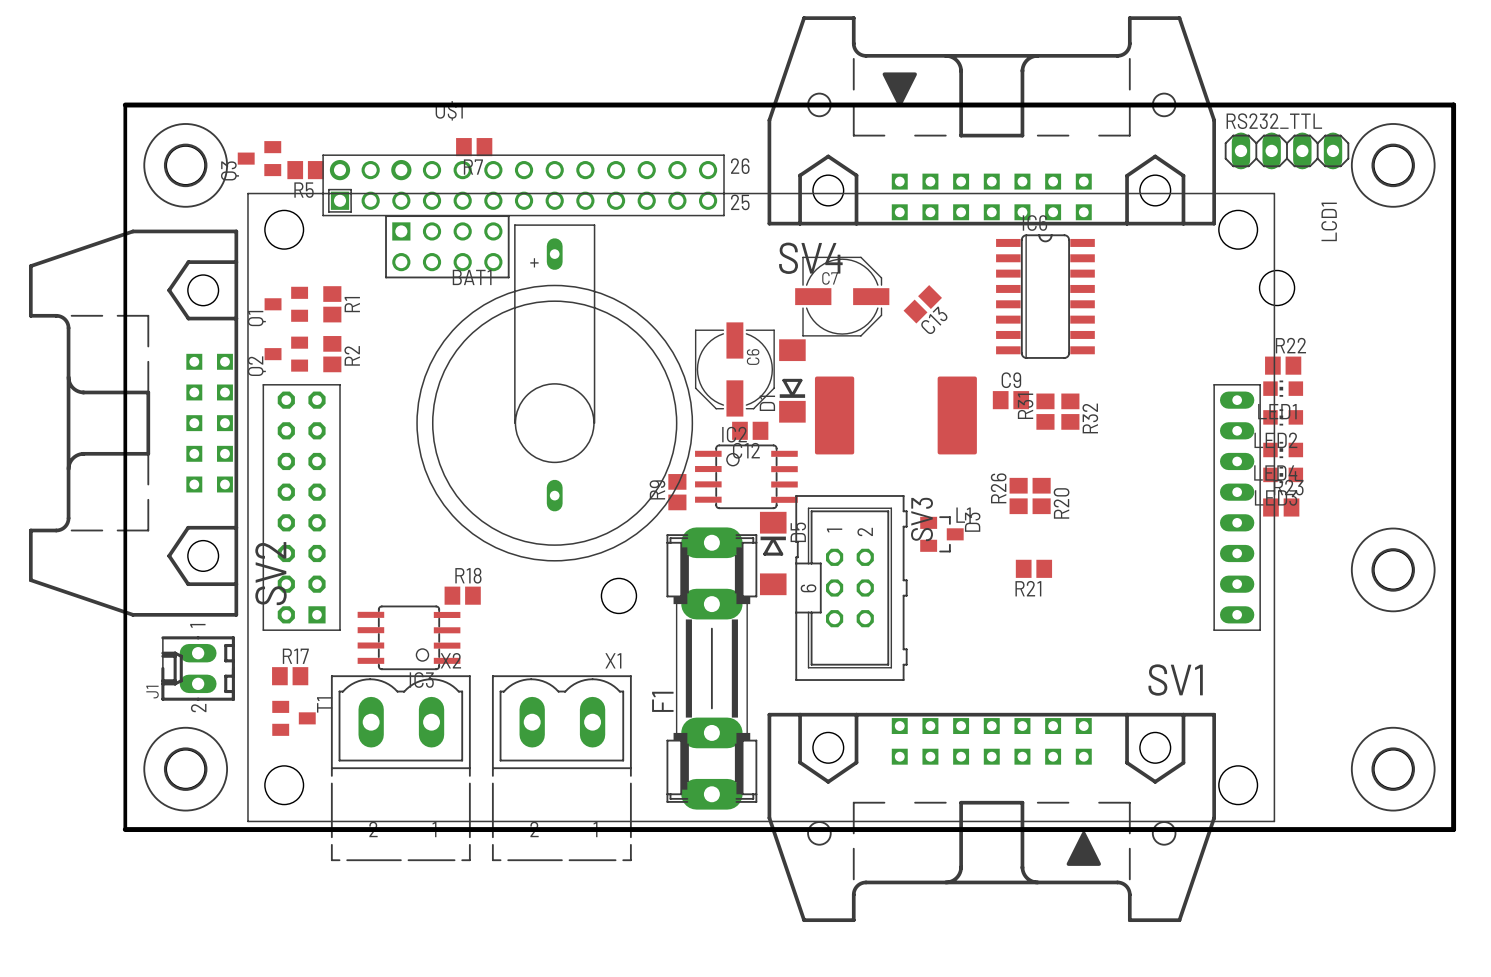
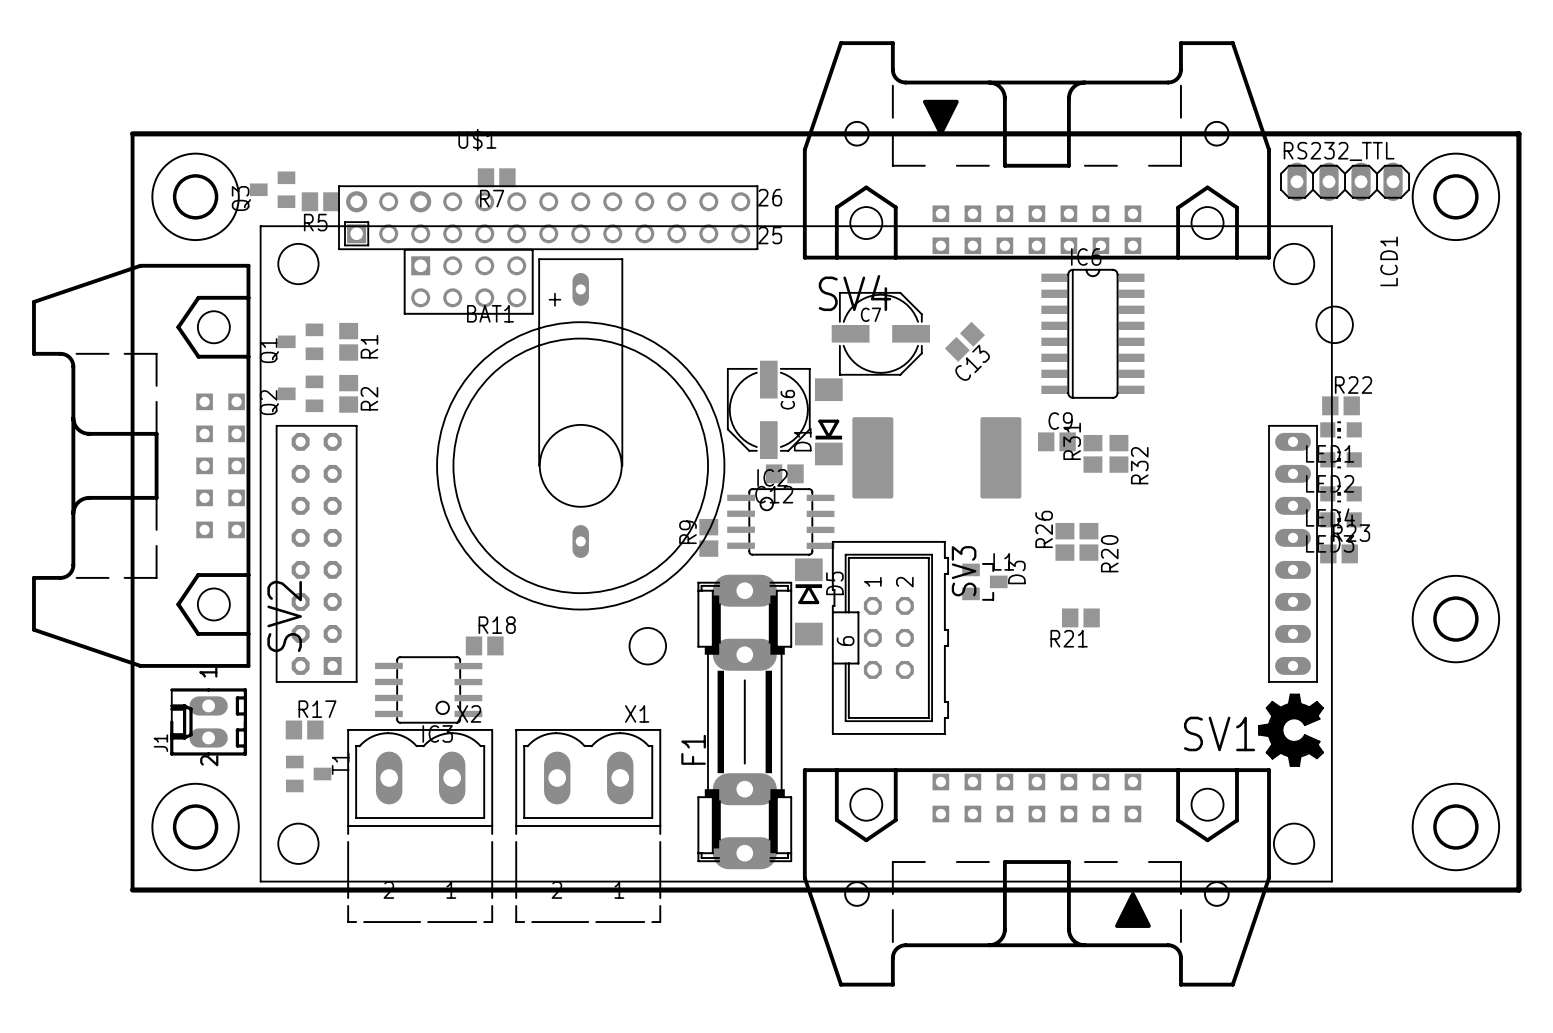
drawing: none -> [1258, 693, 1324, 767]

